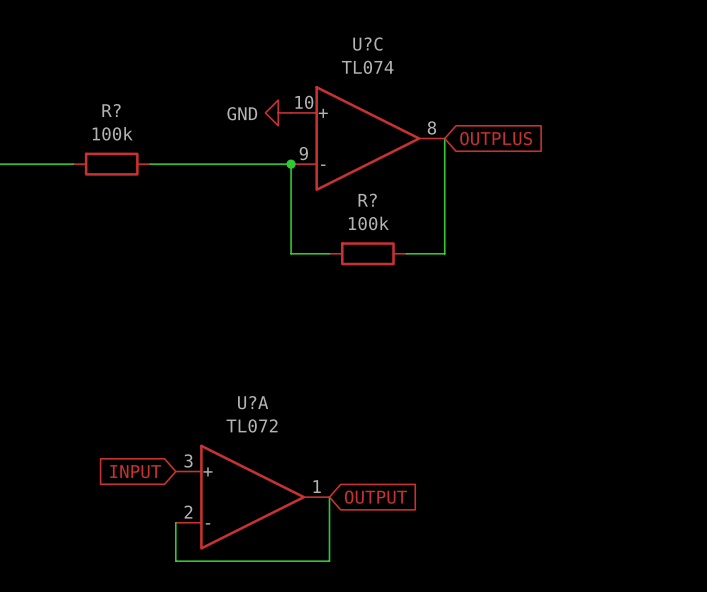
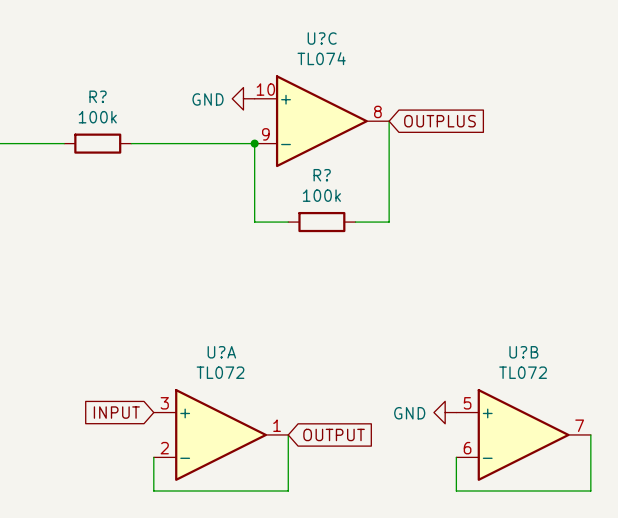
power symbol: none -> GND (445, 412)
U?B: none -> TL072 (523, 434)
wire: none -> (590, 434) (590, 491) (456, 491) (456, 457)

